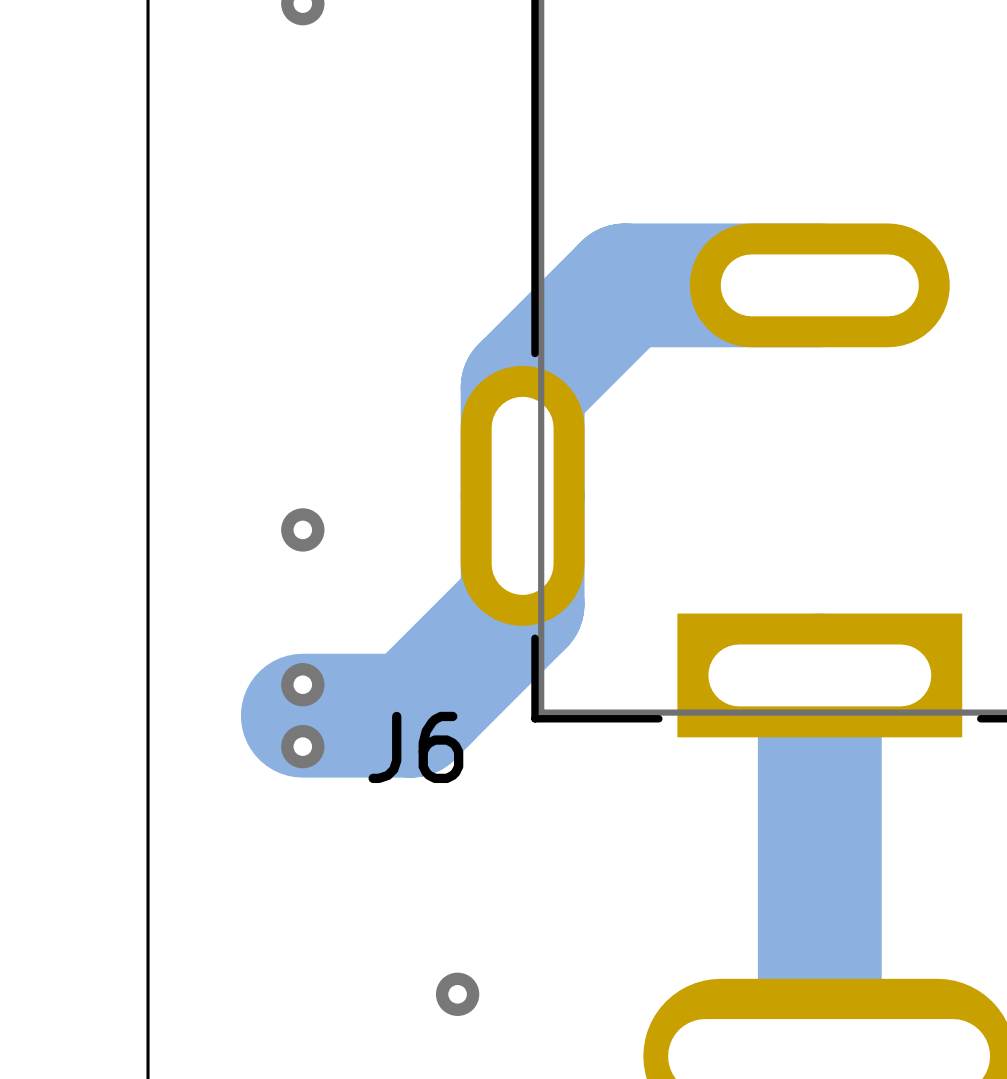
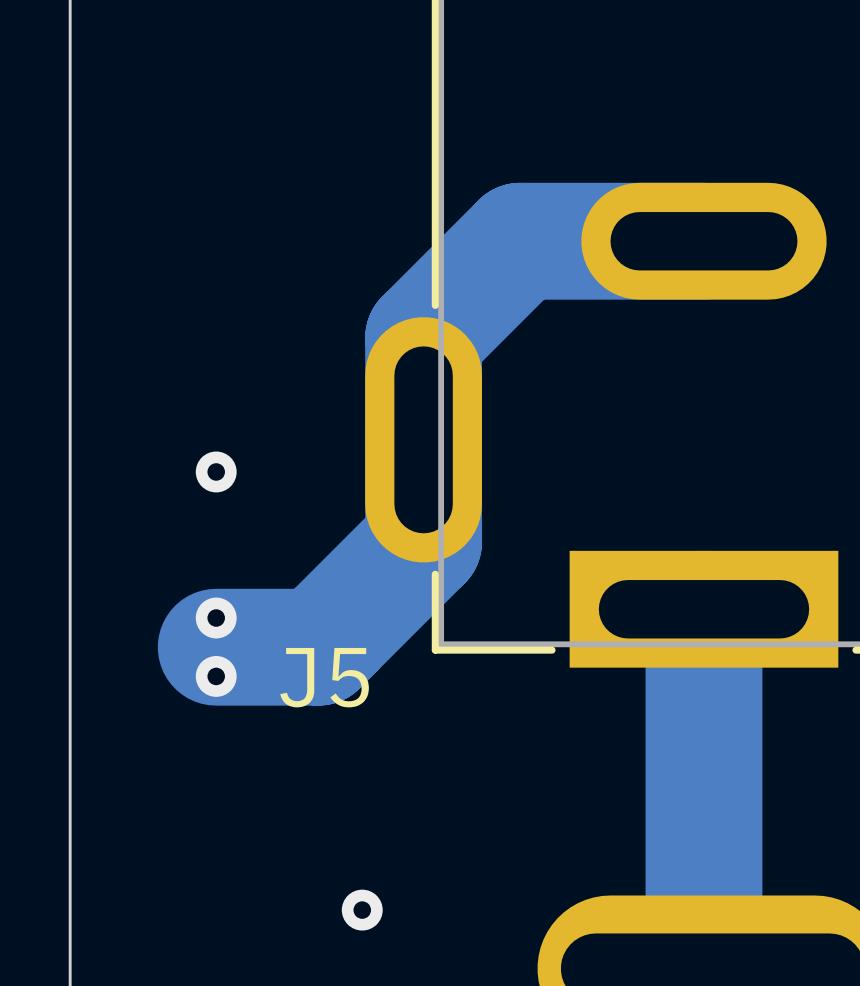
J6 name: J6 (415, 747) -> J5 (324, 677)

